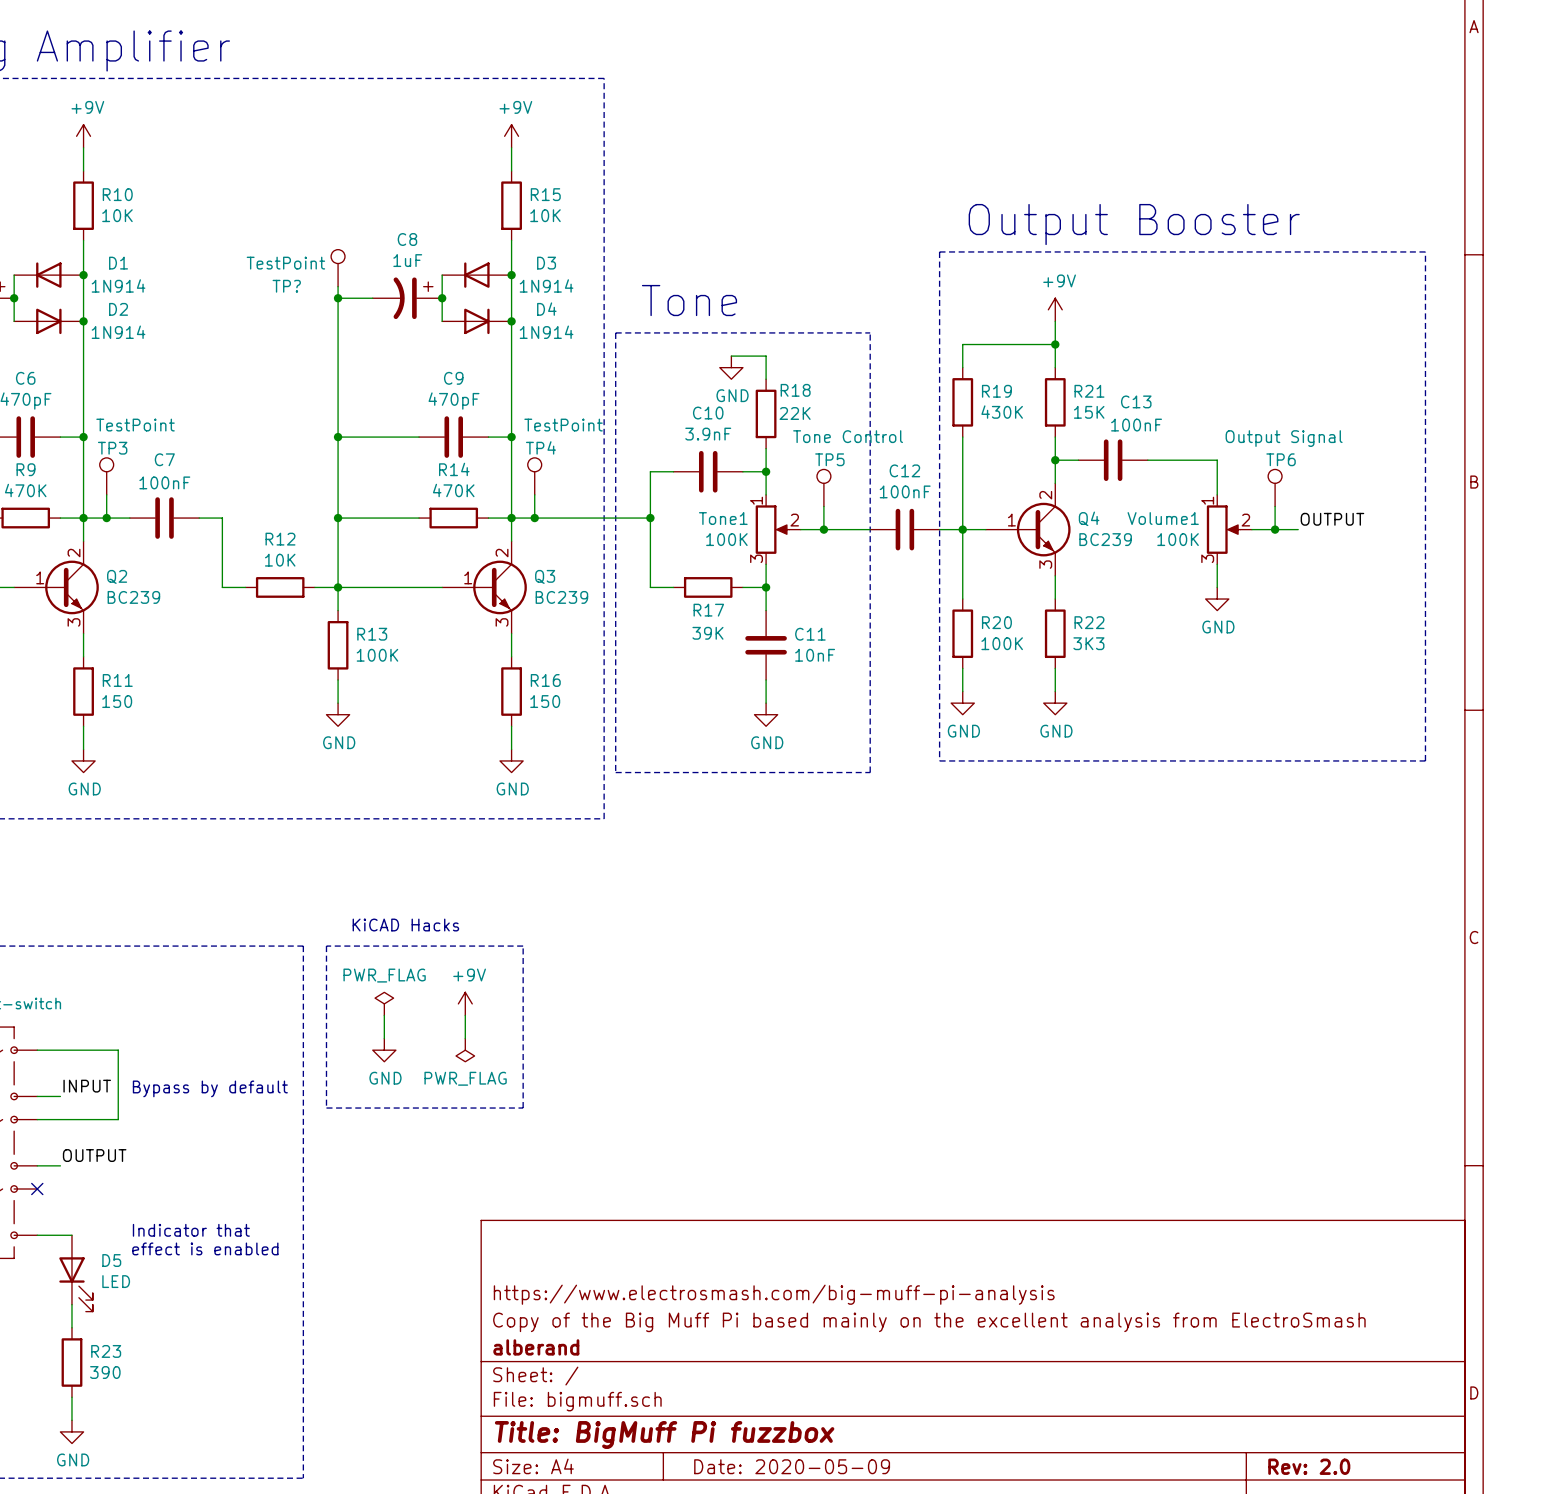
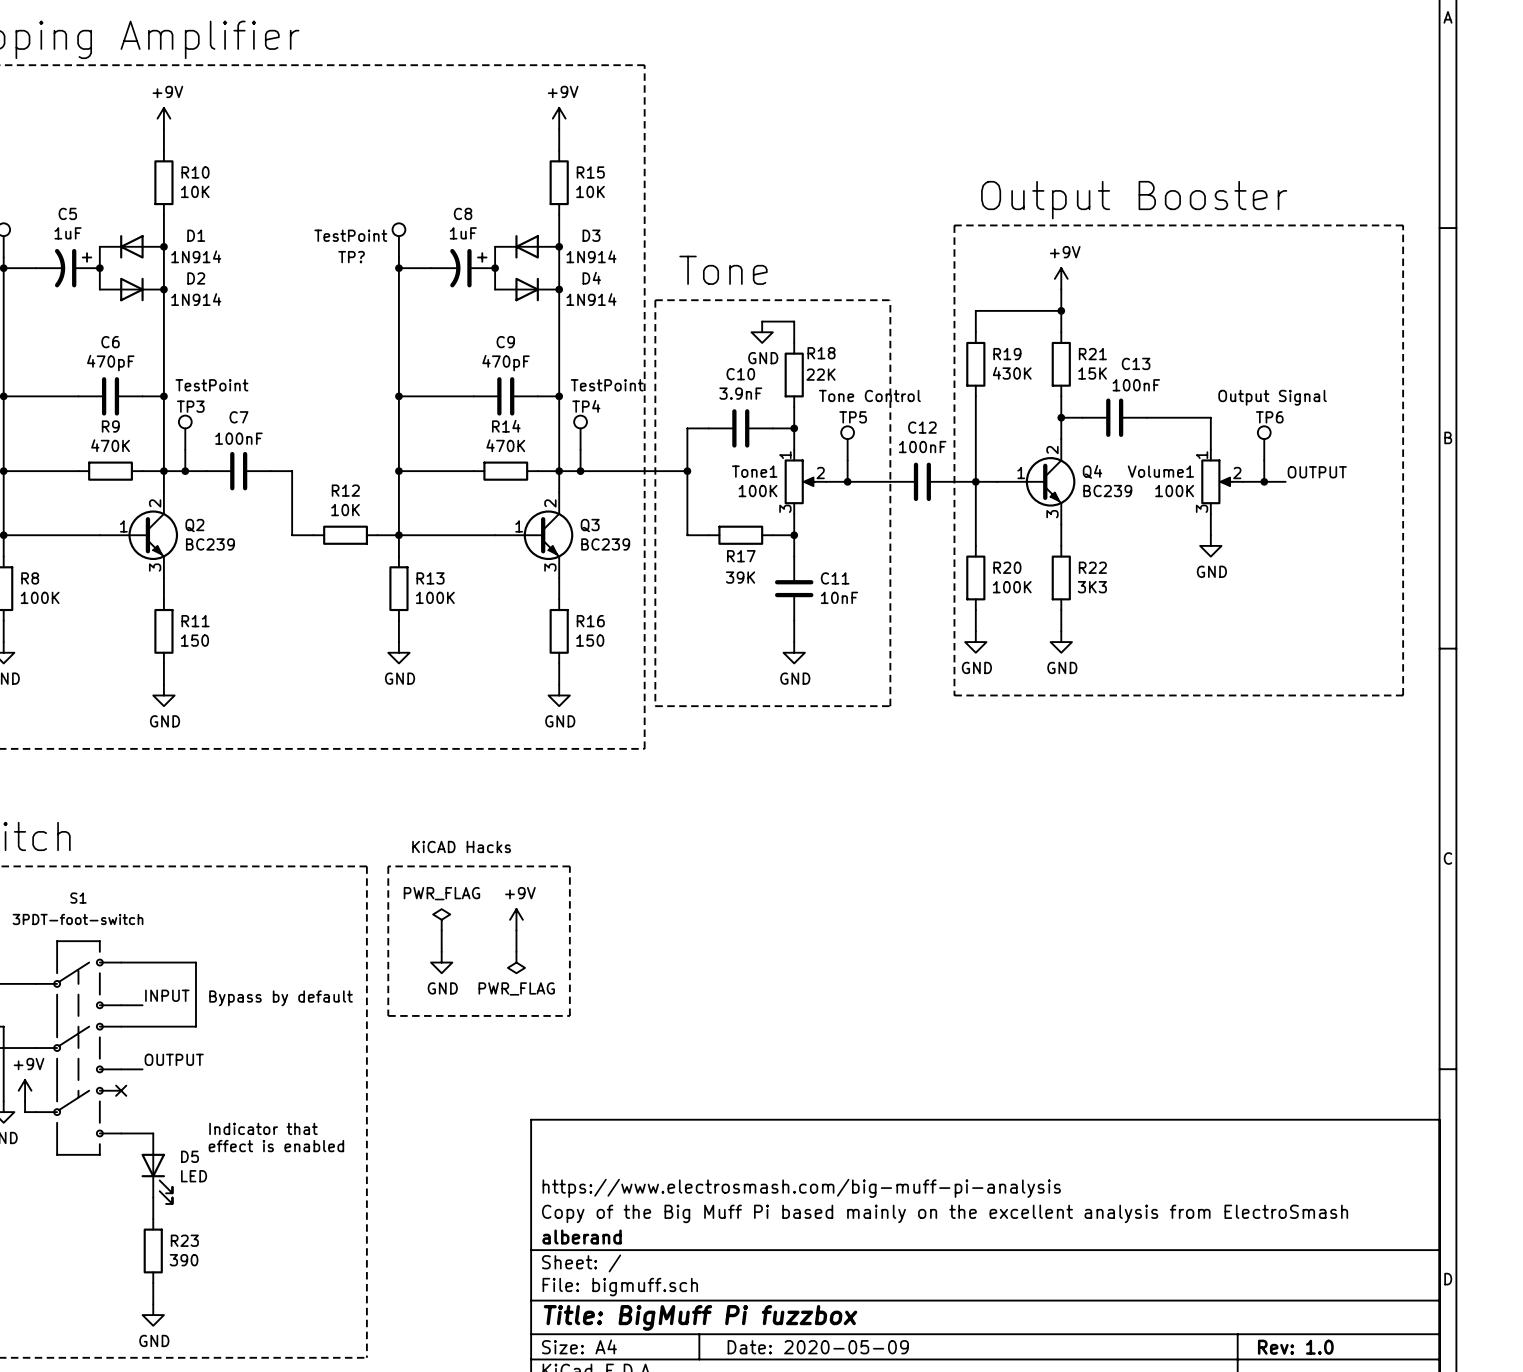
title block: Rev: 2.0 (1309, 1466) -> Rev: 1.0 (1295, 1347)

